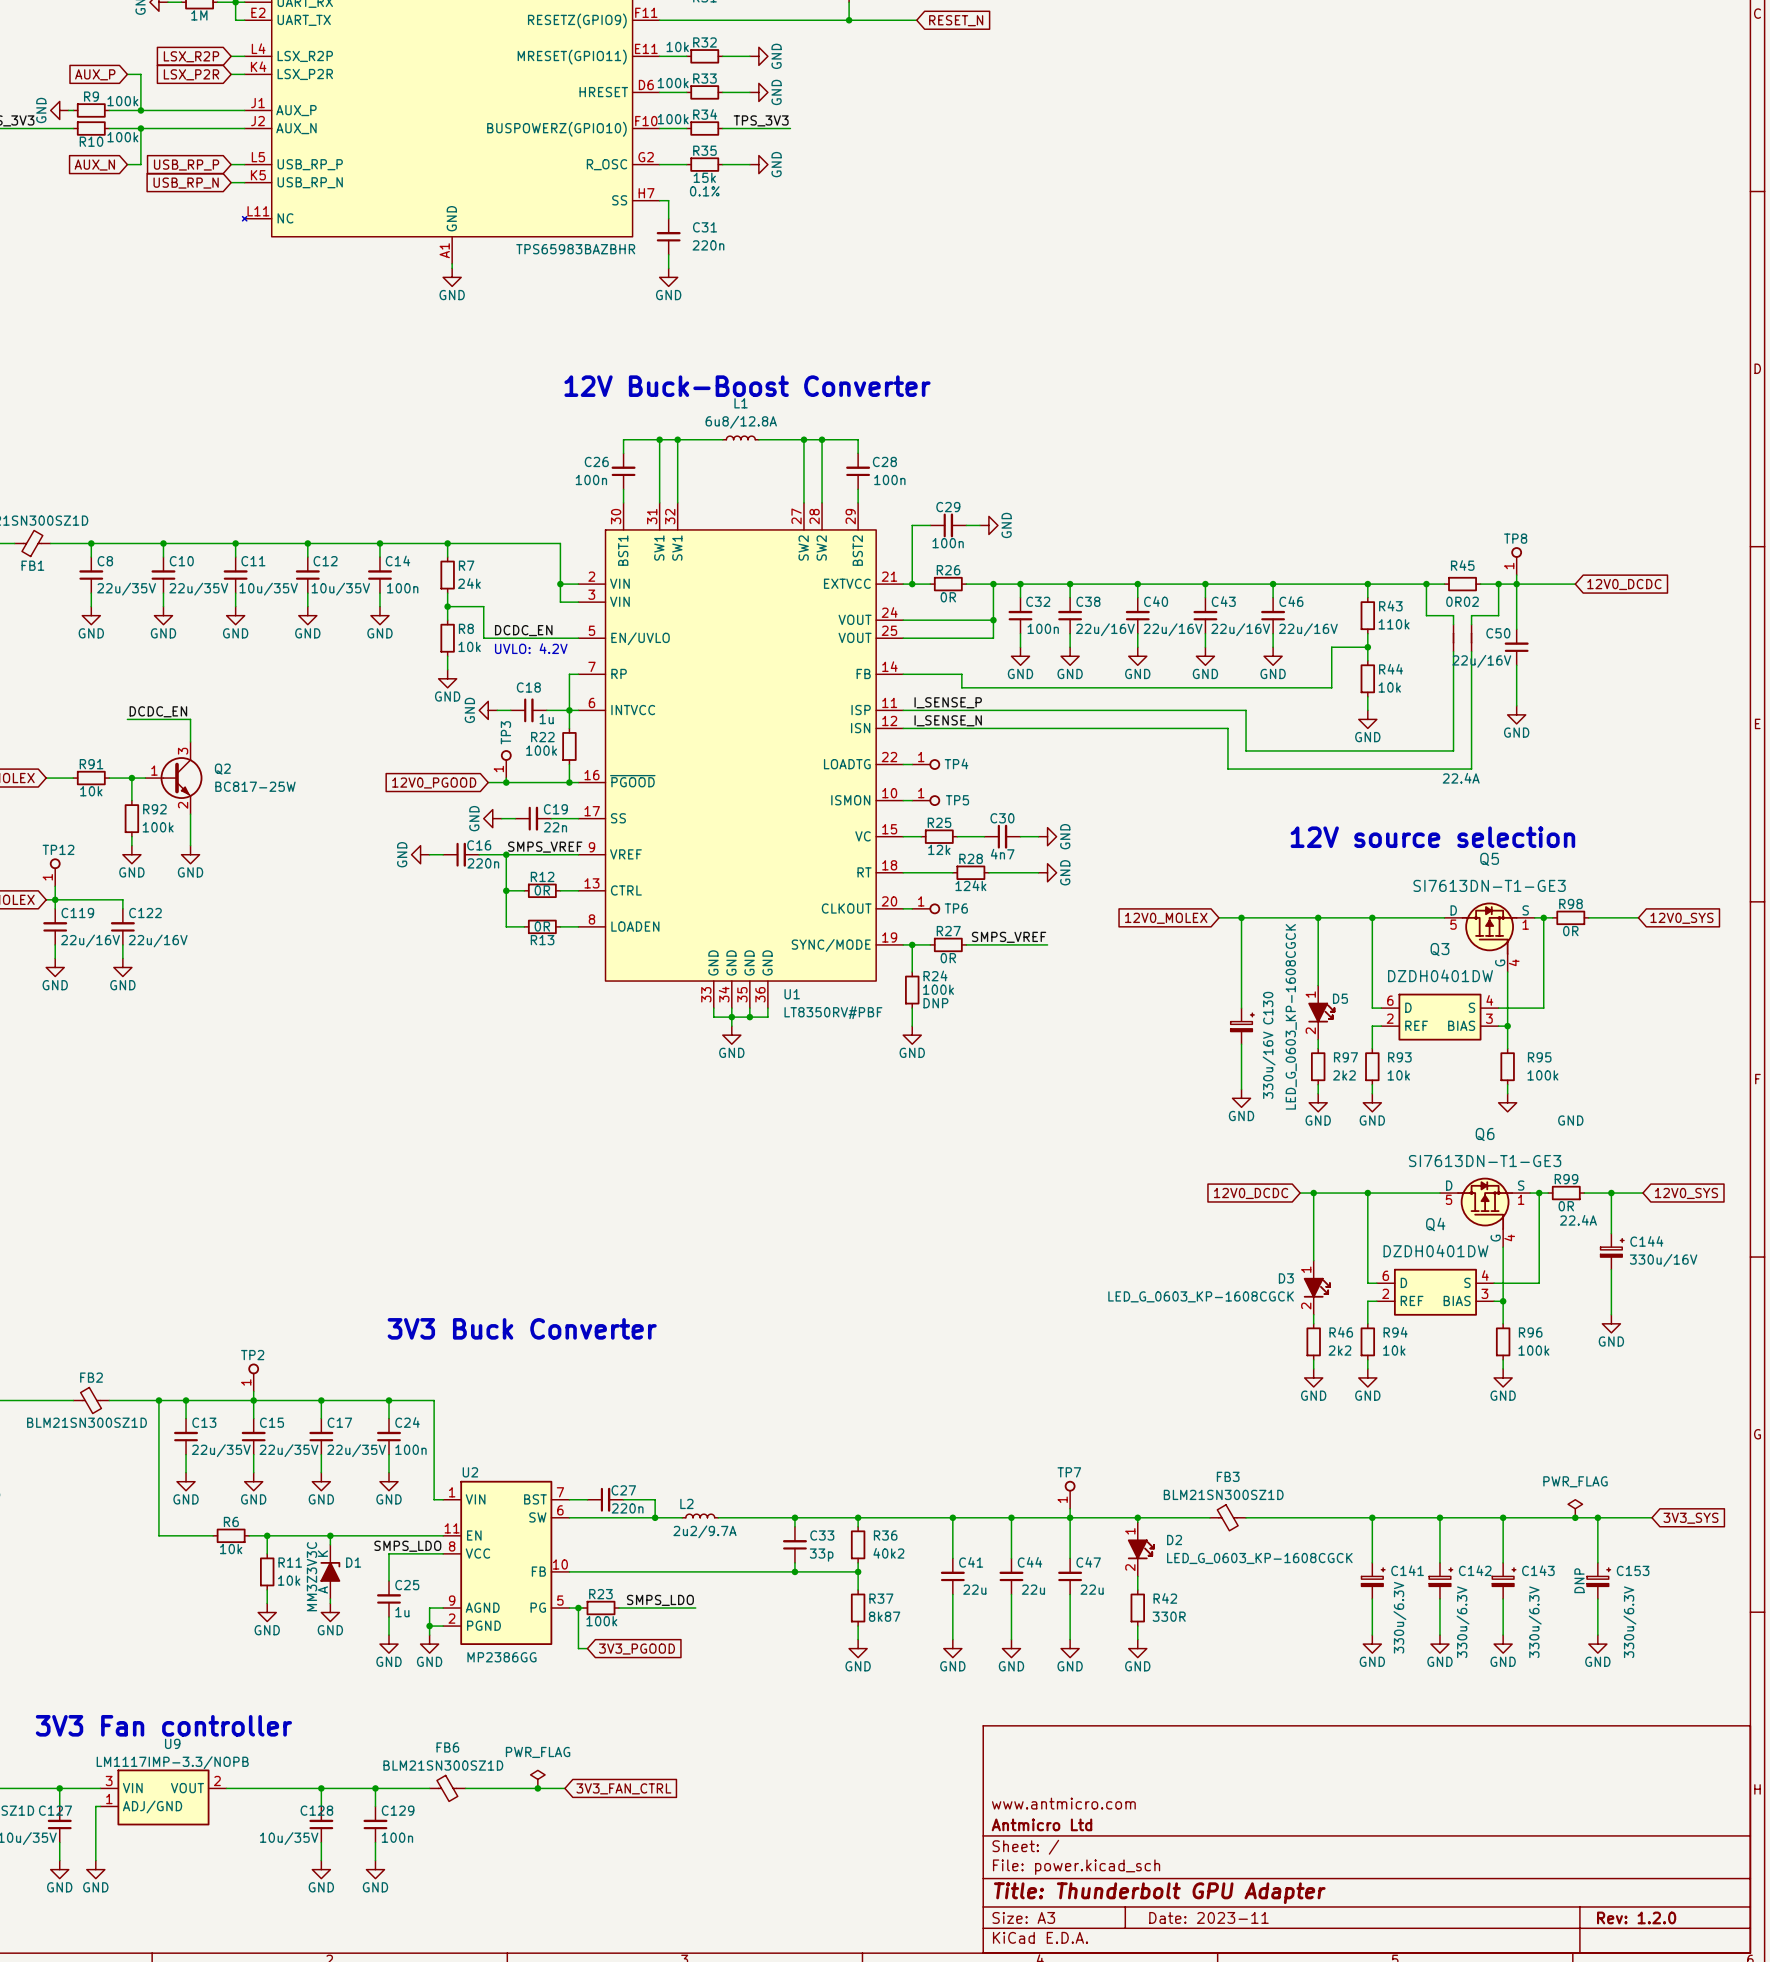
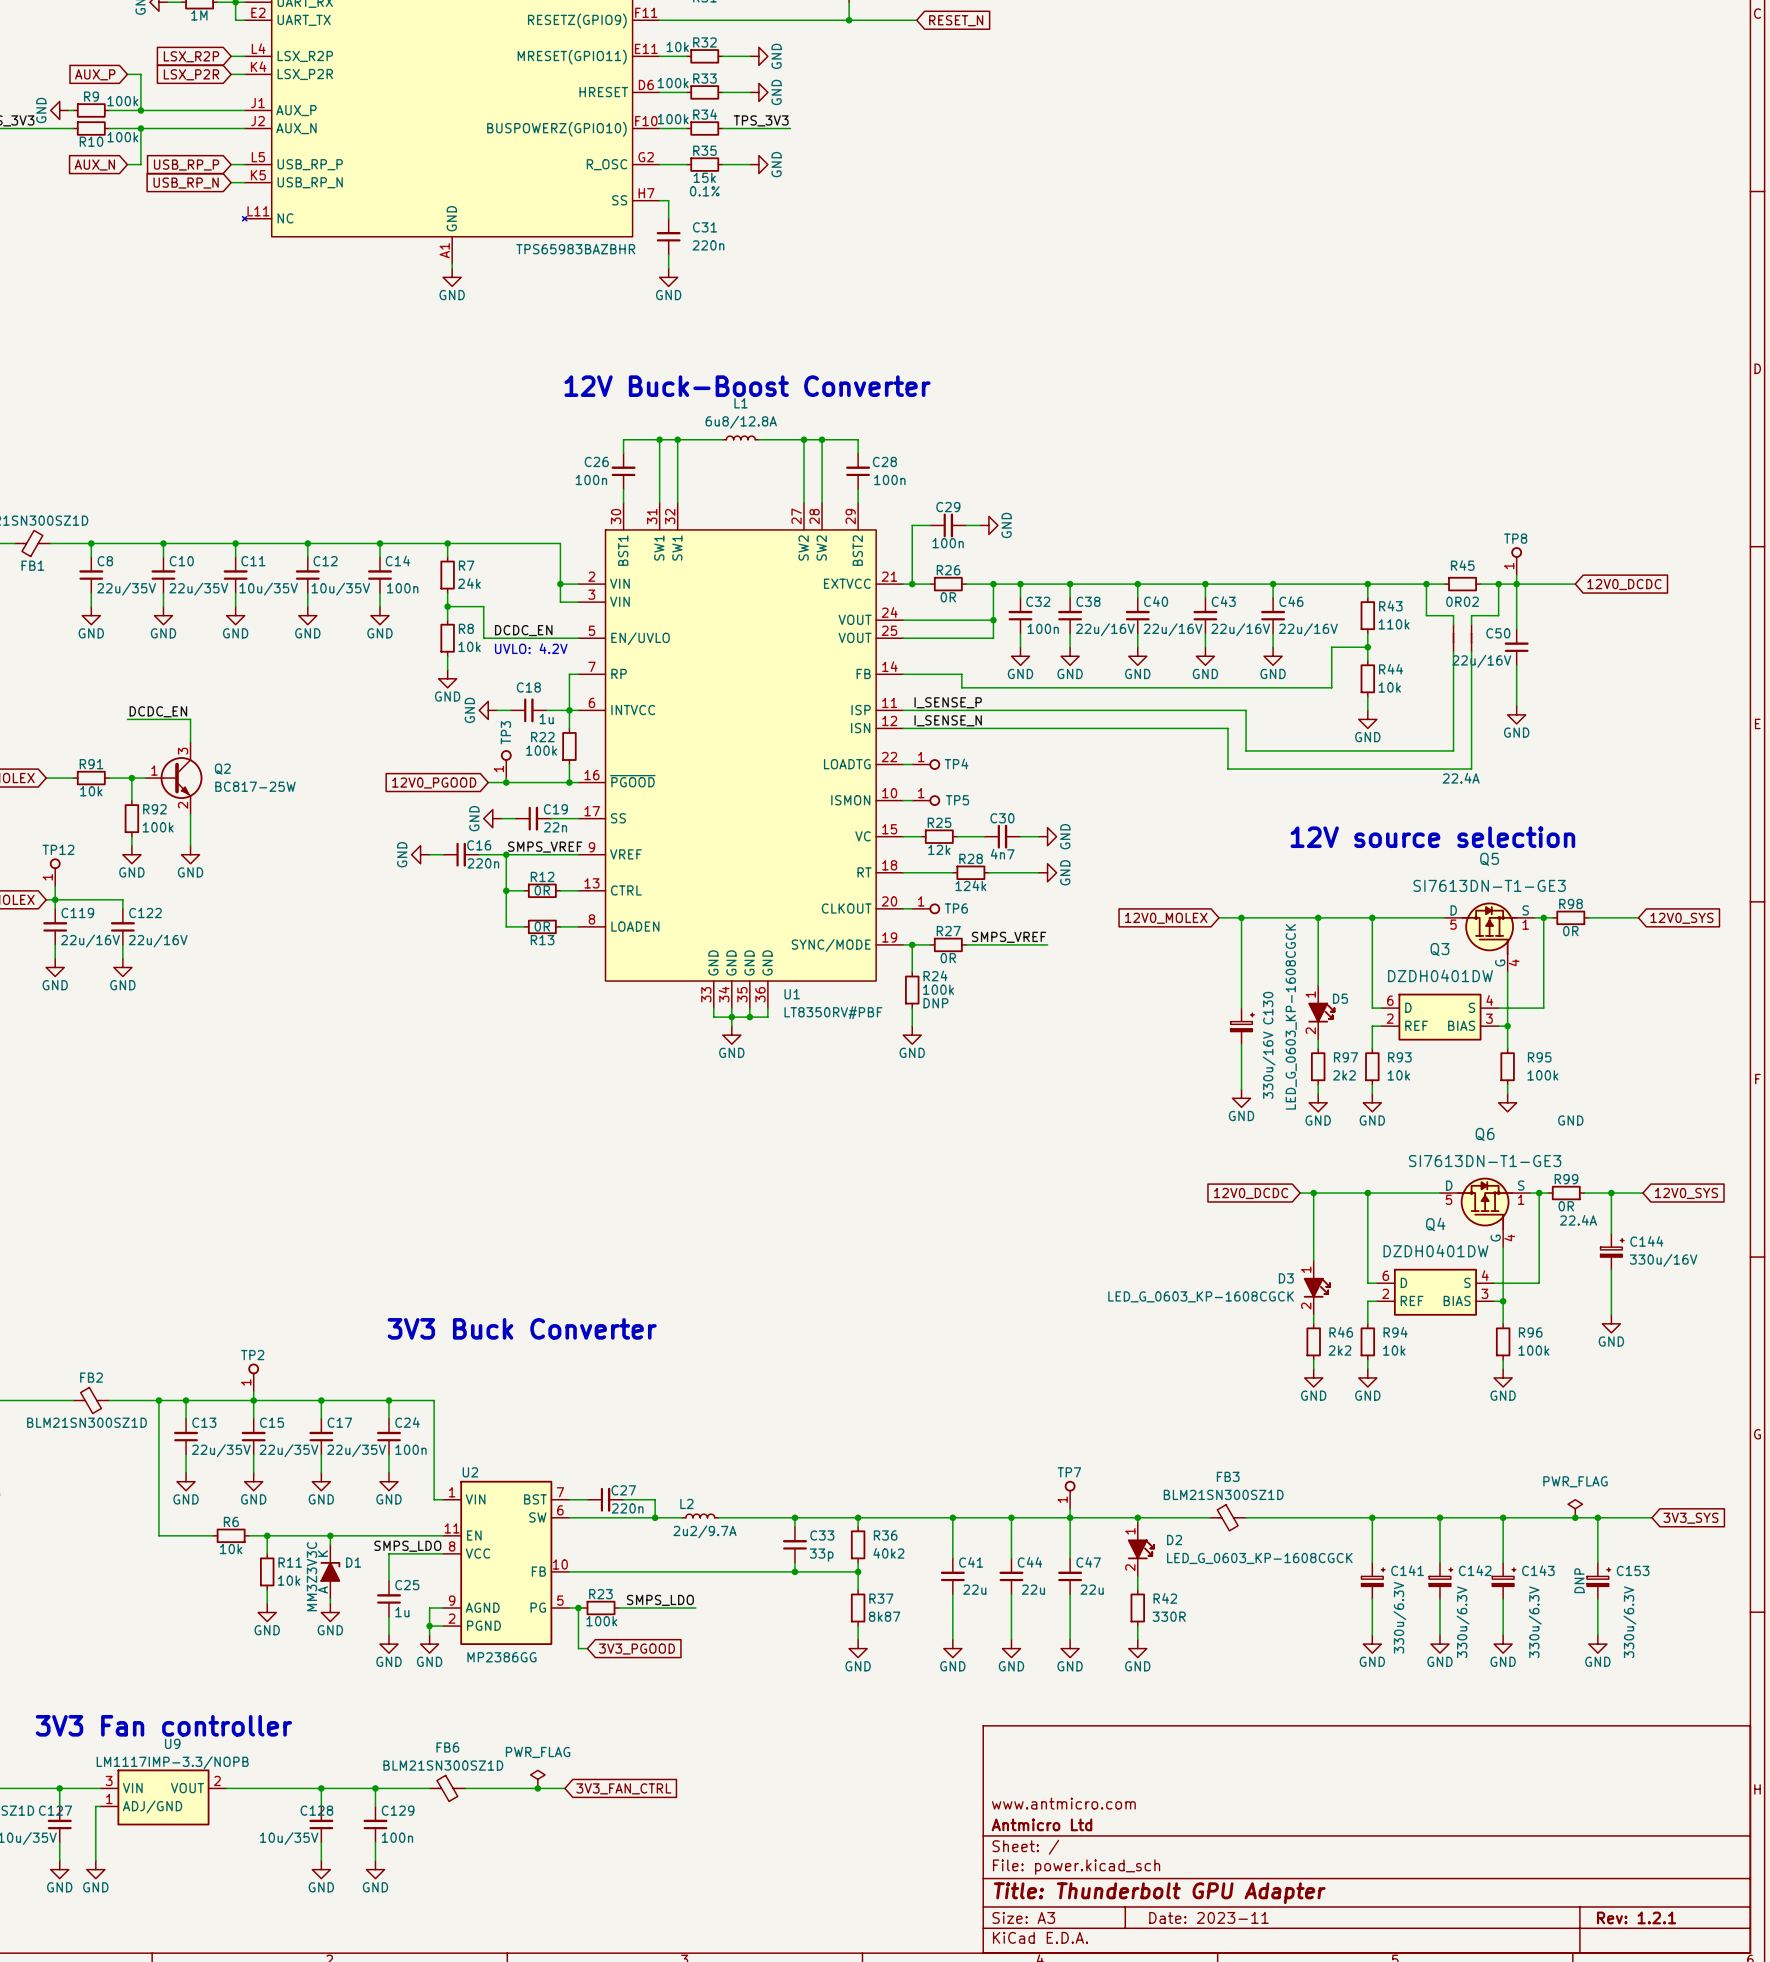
title block: Rev: 1.2.0 (1636, 1917) -> Rev: 1.2.1 (1636, 1917)

